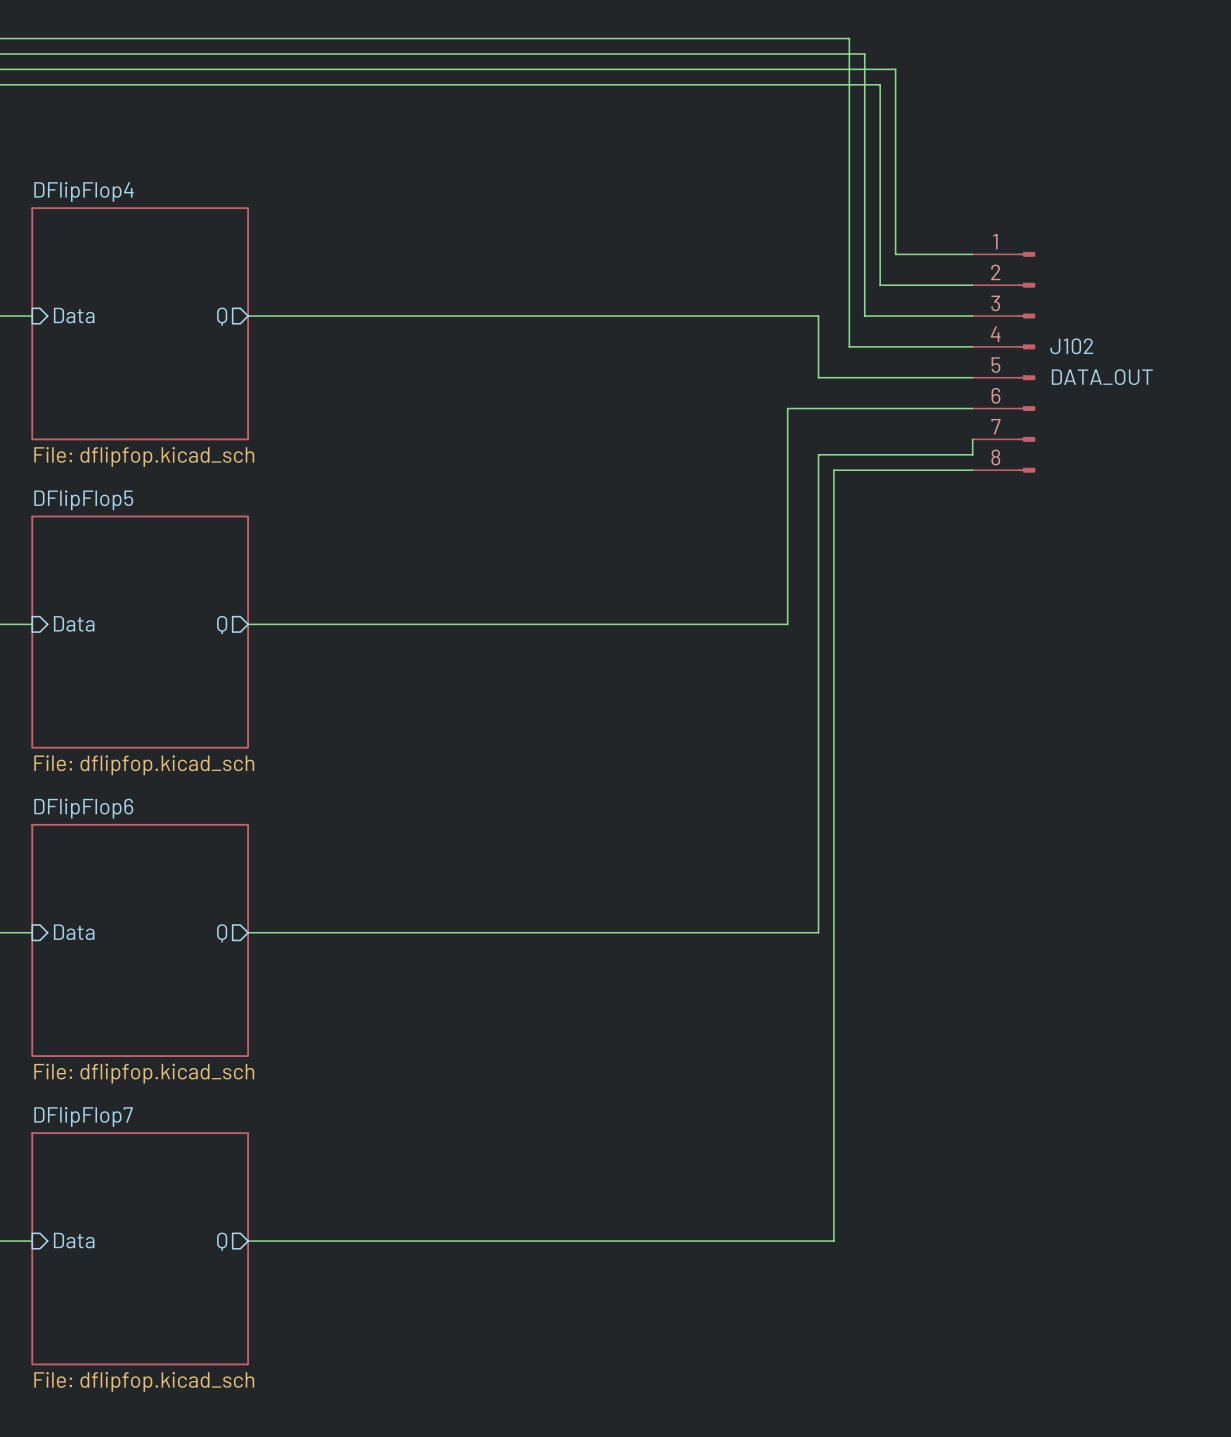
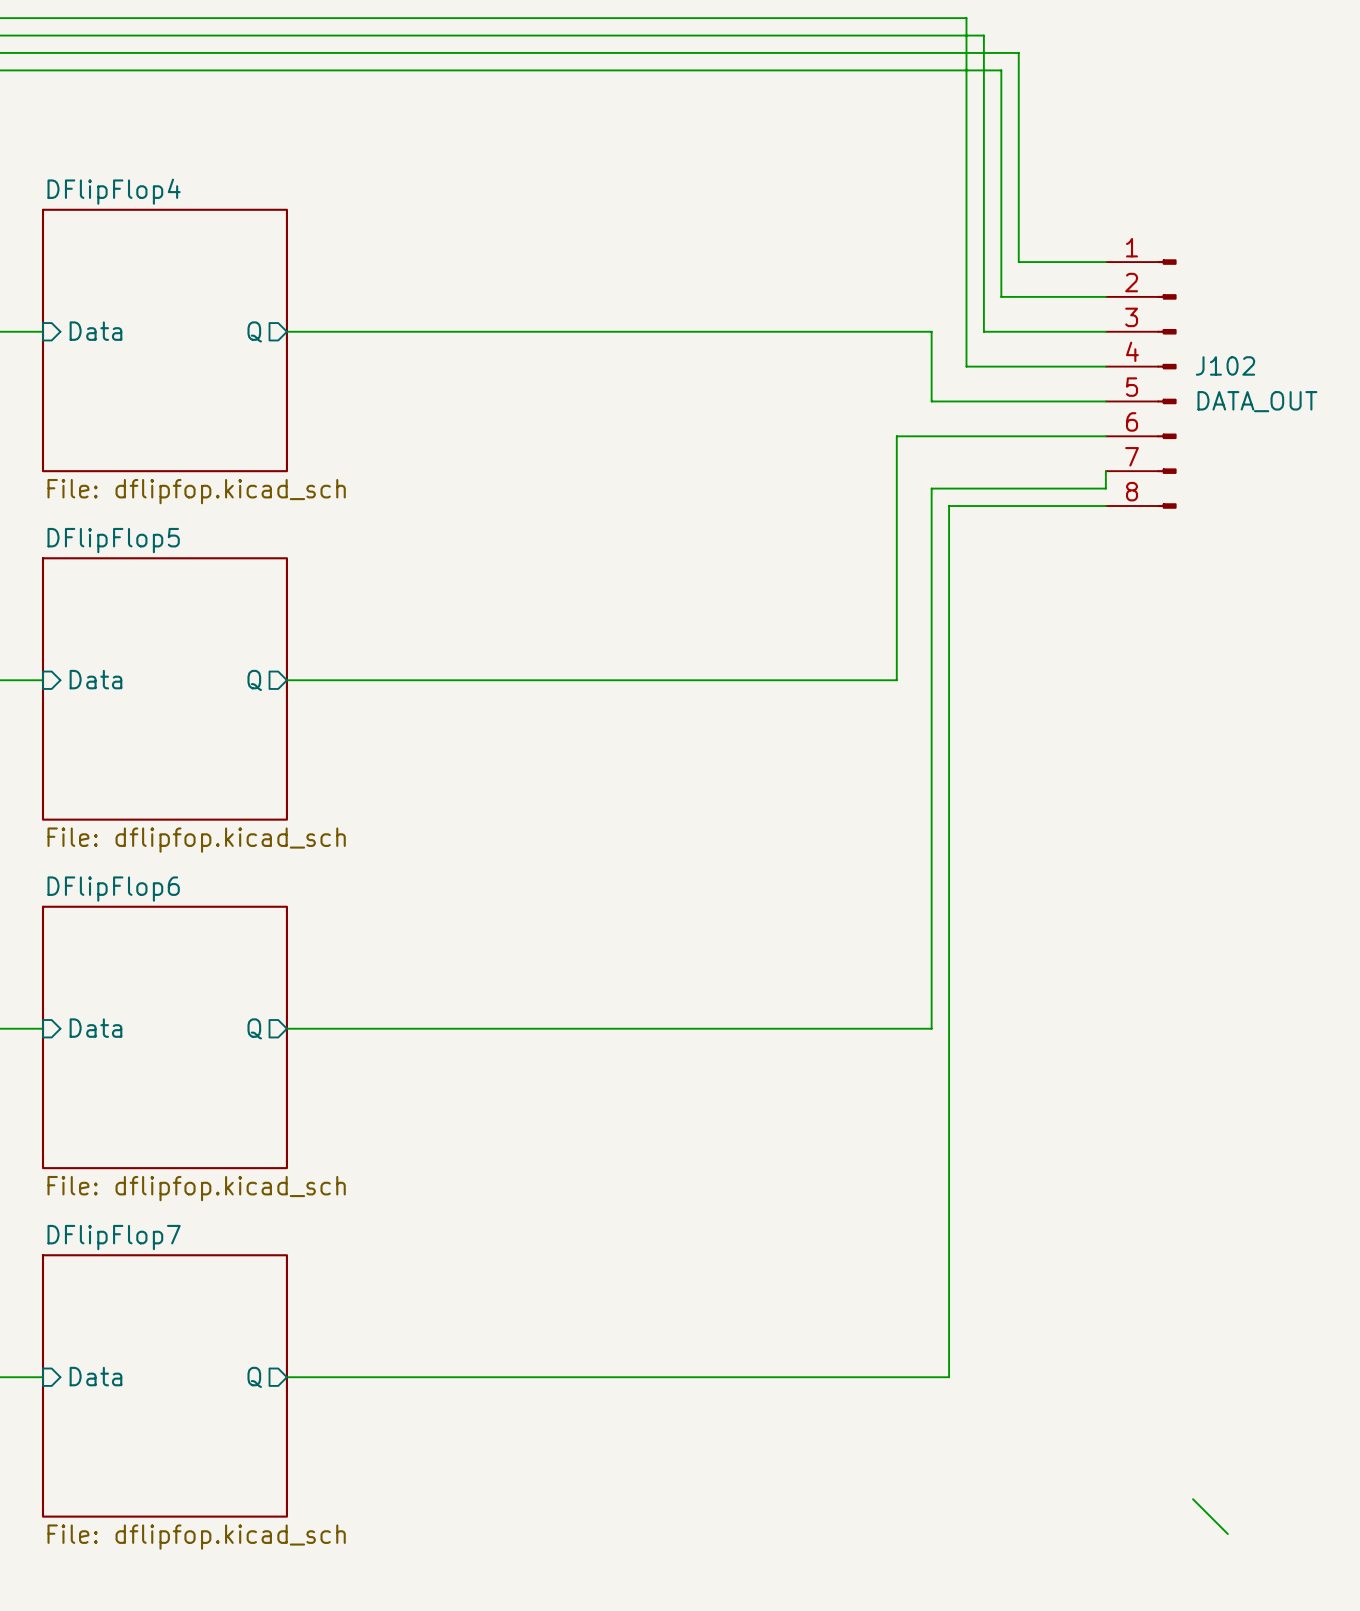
wire: none -> (1193, 1499) (1227, 1534)

